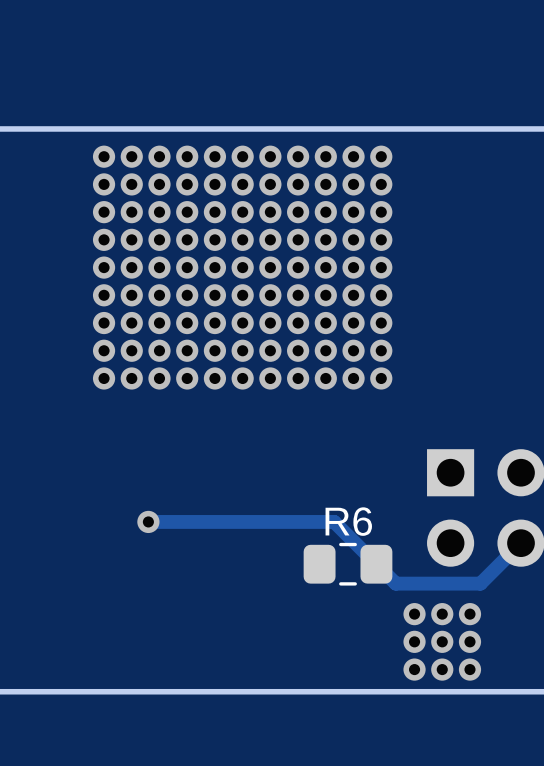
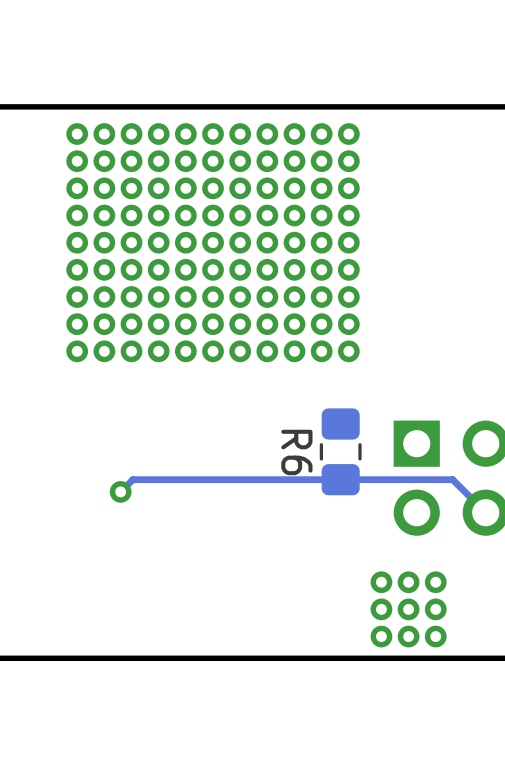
track: (148, 521) (334, 521) (395, 583) (480, 583) (521, 543) -> (120, 491) (132, 479) (452, 479) (485, 512)
R6 name position: R6 (348, 521) -> R6 (296, 452)
R6 rotation: 0° (348, 564) -> 90° clockwise (340, 451)
R6 position: (348, 564) -> (340, 451)

